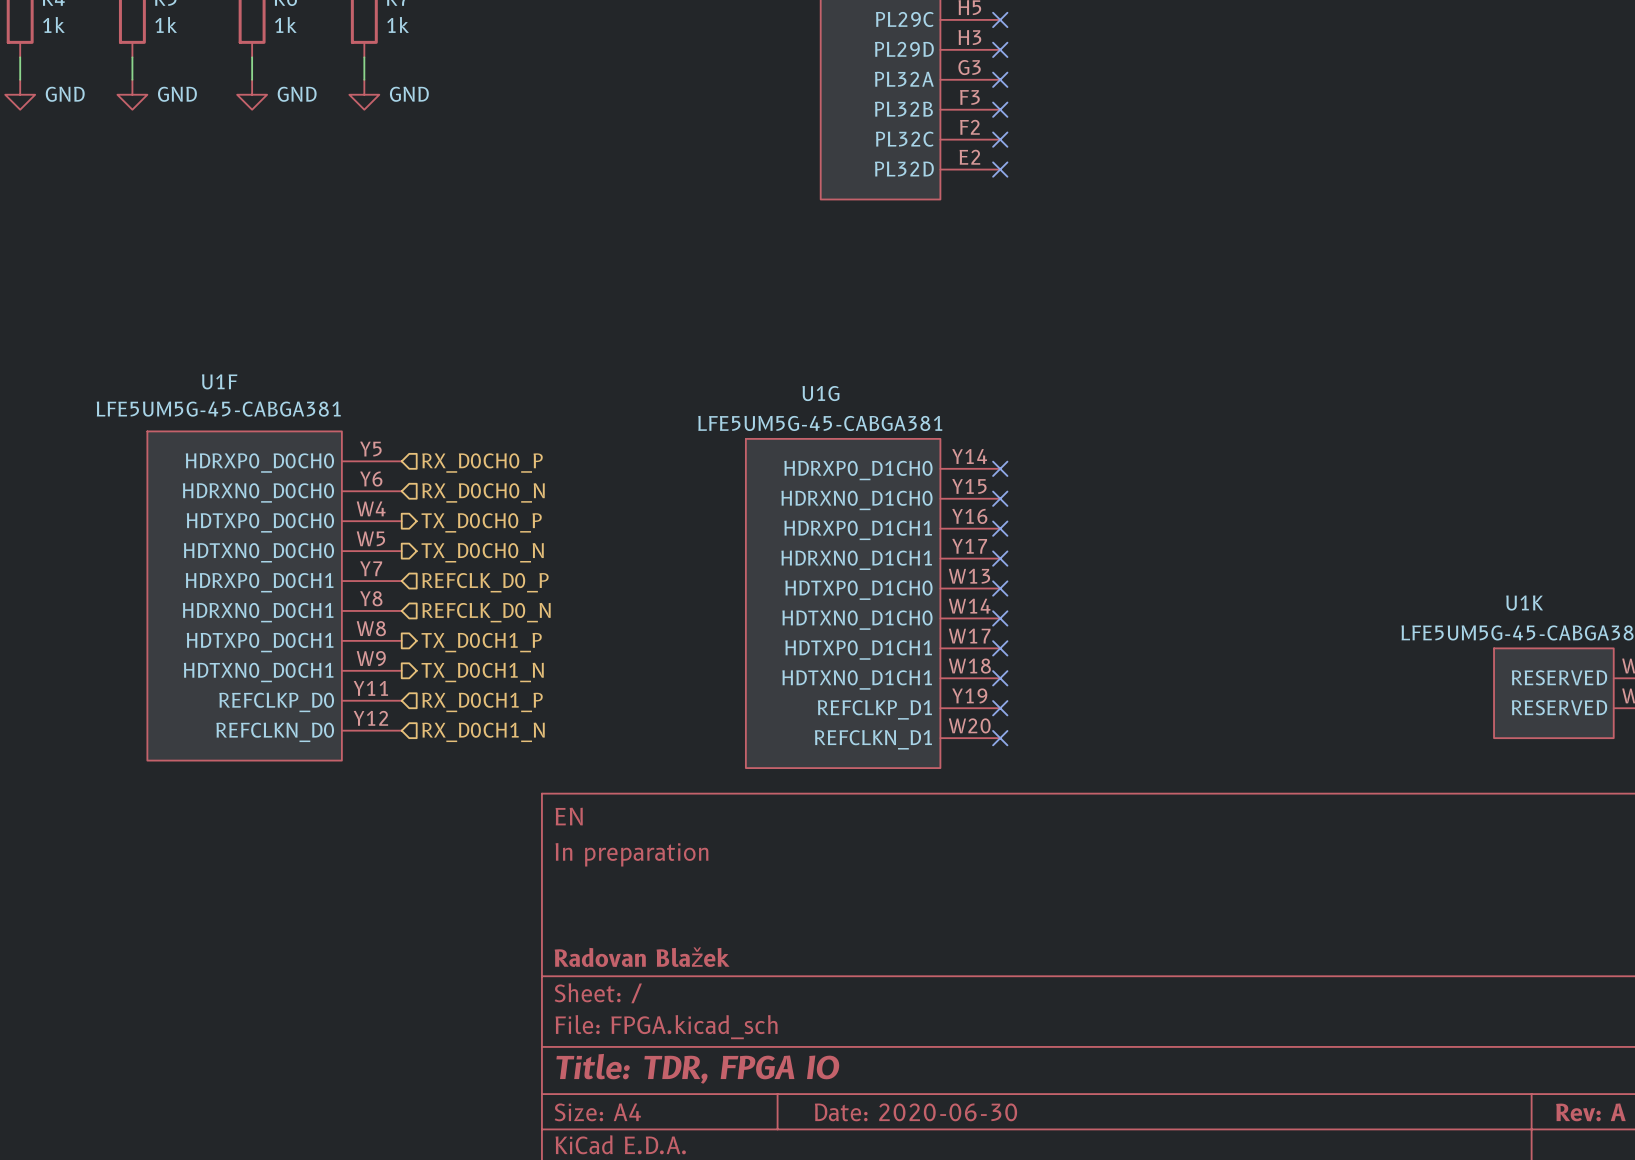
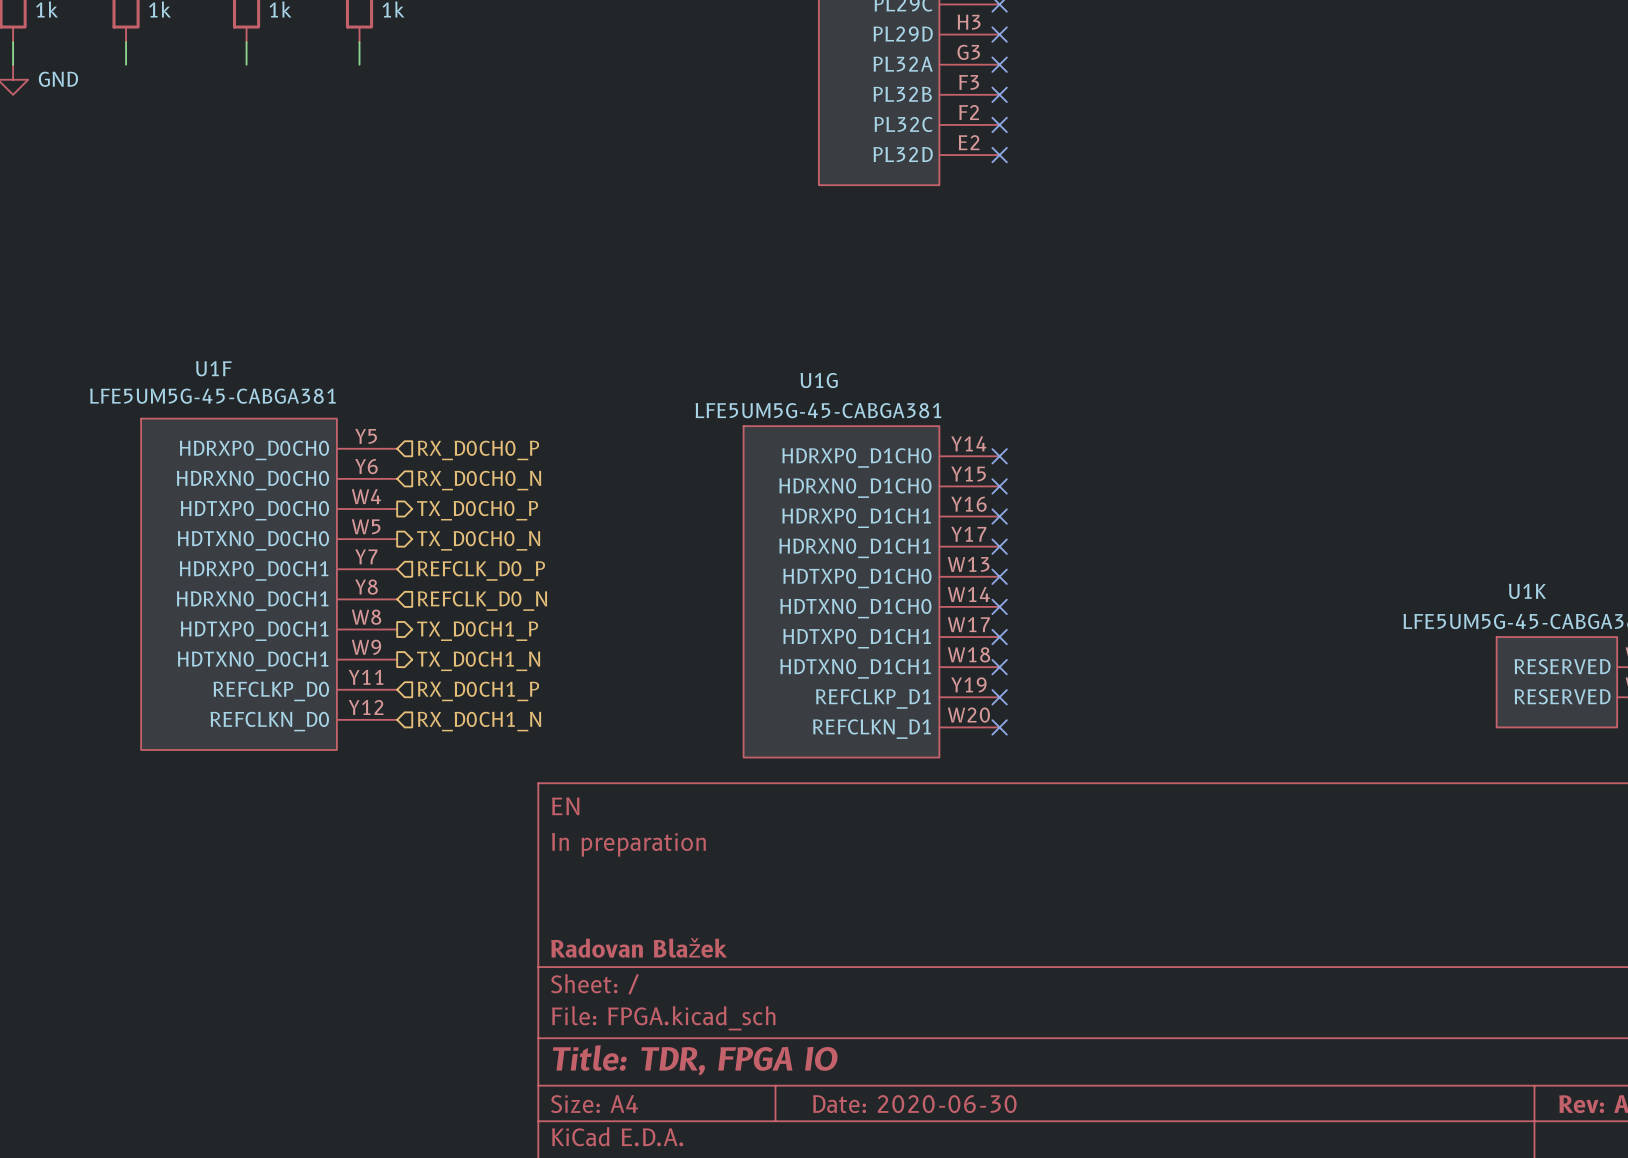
power symbol: GND (132, 94) -> none
power symbol: GND (252, 94) -> none
power symbol: GND (364, 94) -> none

